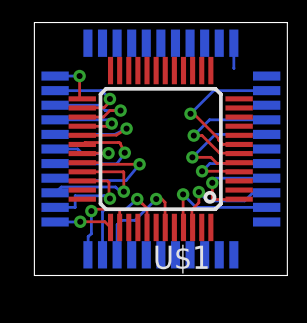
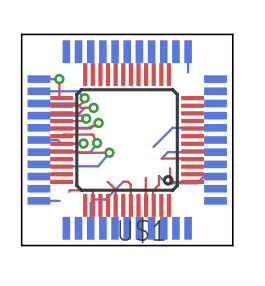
bottom track: (266, 90) (213, 90) (190, 113) -> none
top track: (190, 113) (193, 113) (222, 144) (239, 144) -> none
via: (190, 113) -> none
bottom track: (266, 119) (209, 119) (193, 135) -> none
top track: (193, 135) (202, 135) (219, 153) (239, 153) -> none
via: (193, 135) -> none
top track: (192, 157) (210, 157) (216, 163) (239, 162) -> none
via: (192, 157) -> none
top track: (82, 171) (123, 171) (123, 191) -> none
via: (202, 171) -> none
bottom track: (266, 178) (215, 178) (212, 182) -> none
top track: (82, 180) (107, 180) (109, 198) -> none
via: (212, 182) -> none
bottom track: (57, 190) (55, 192) (61, 187) (115, 187) (120, 191) (123, 191) -> none
via: (123, 191) -> none
via: (198, 192) -> none
bottom track: (183, 194) (196, 207) (266, 207) -> none
via: (183, 194) -> none
bottom track: (109, 198) (104, 195) (75, 195) (75, 207) (55, 207) -> none
via: (109, 198) -> none
bottom track: (137, 199) (125, 209) (104, 209) (102, 211) (102, 254) -> none
via: (137, 199) -> none
via: (156, 199) -> none
bottom track: (91, 211) (91, 233) (88, 236) (88, 254) -> none
via: (91, 211) -> none
top track: (80, 221) (104, 221) (110, 227) -> none
via: (80, 221) -> none

